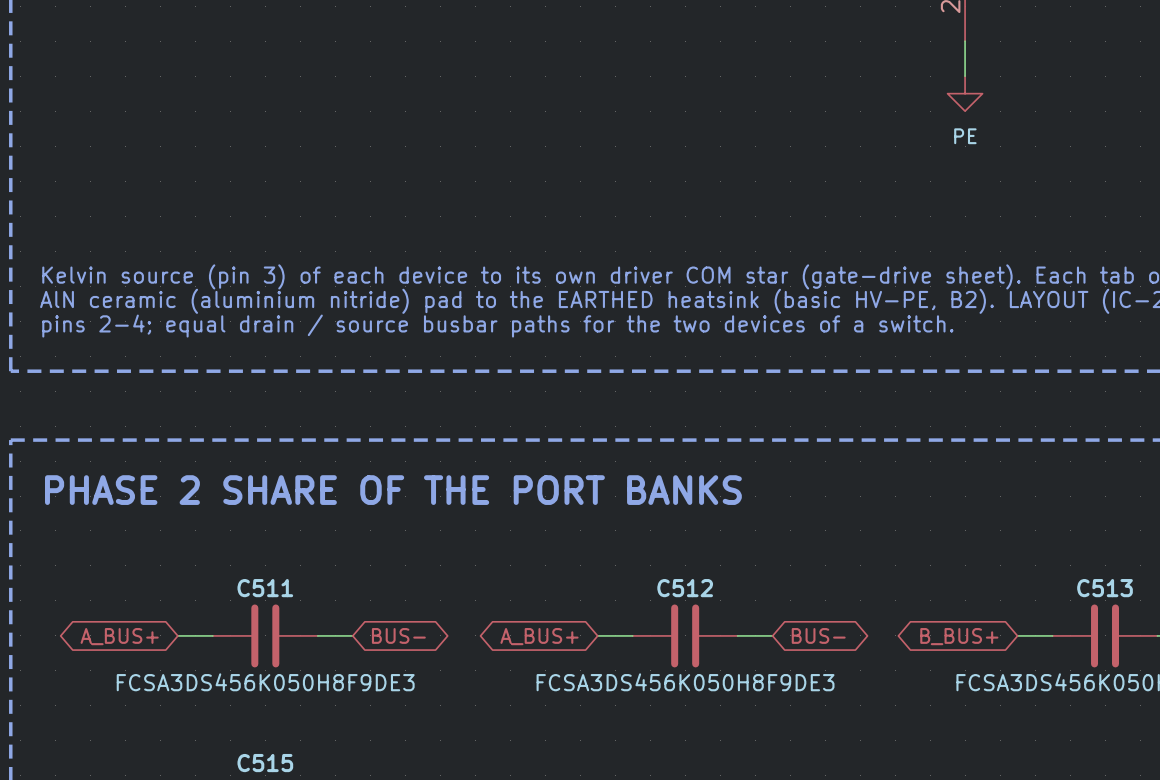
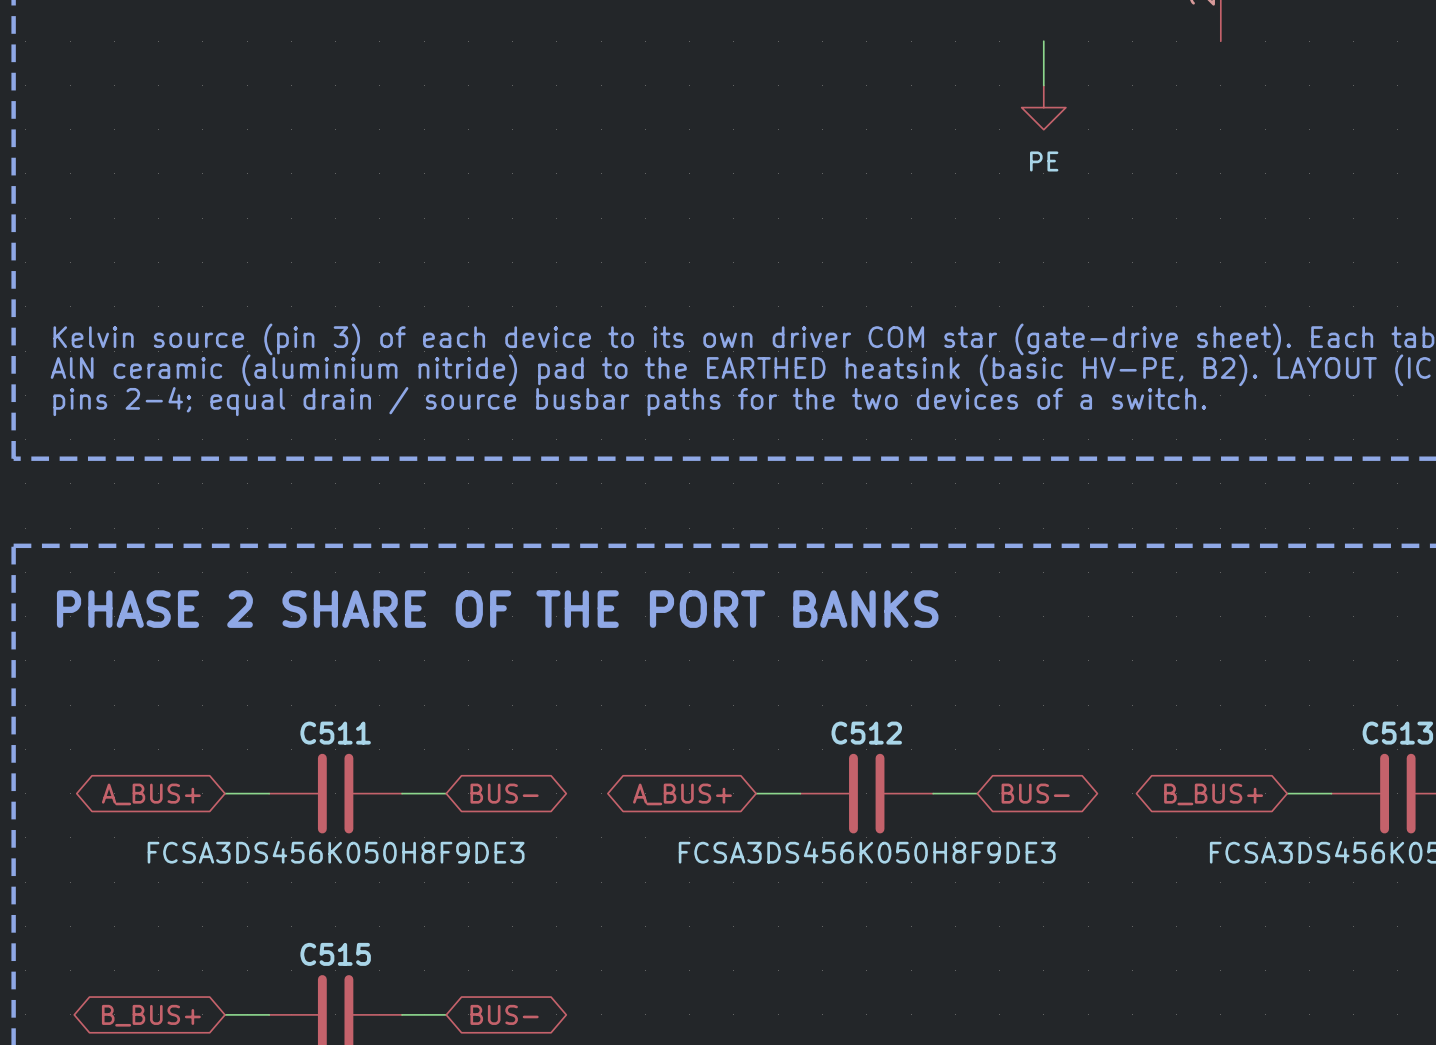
wire: (965, 41) (965, 76) -> (1043, 41) (1043, 85)
power symbol position: PE (965, 93) -> PE (1043, 107)

